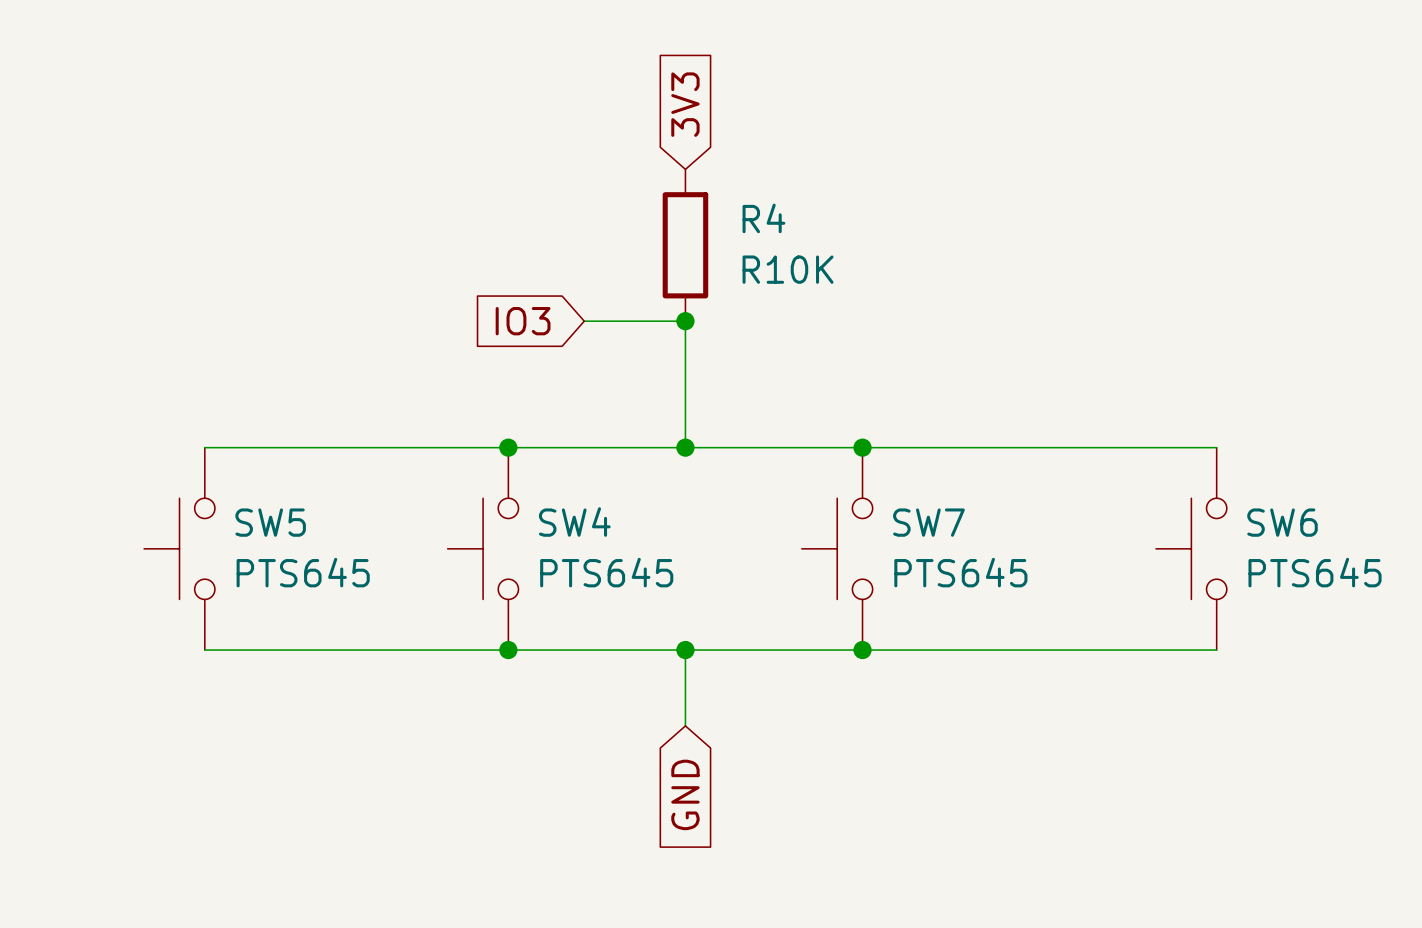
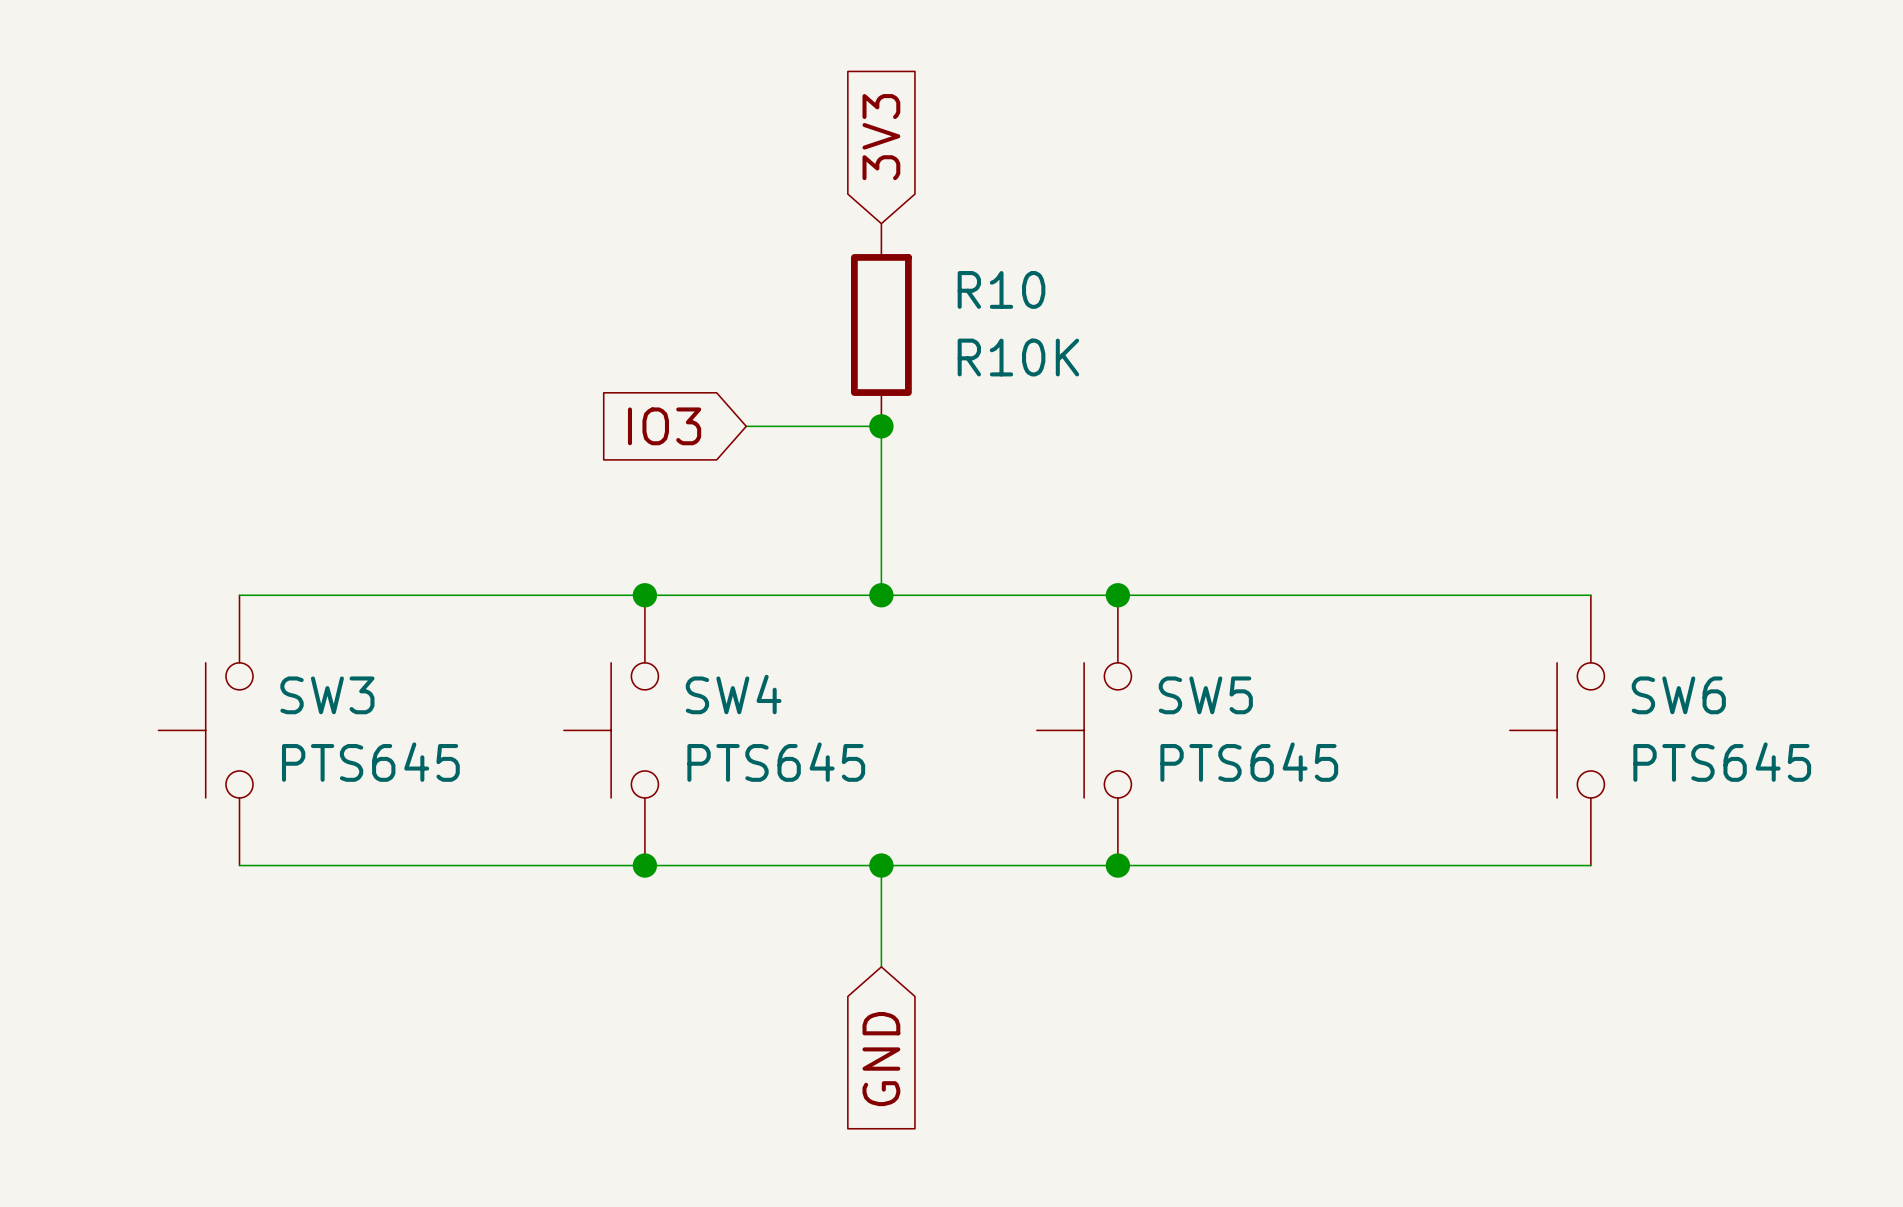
R4 name: R4 (763, 218) -> R10 (1001, 289)
SW5 name: SW5 (270, 522) -> SW3 (327, 695)
SW7 name: SW7 (928, 522) -> SW5 (1205, 695)

